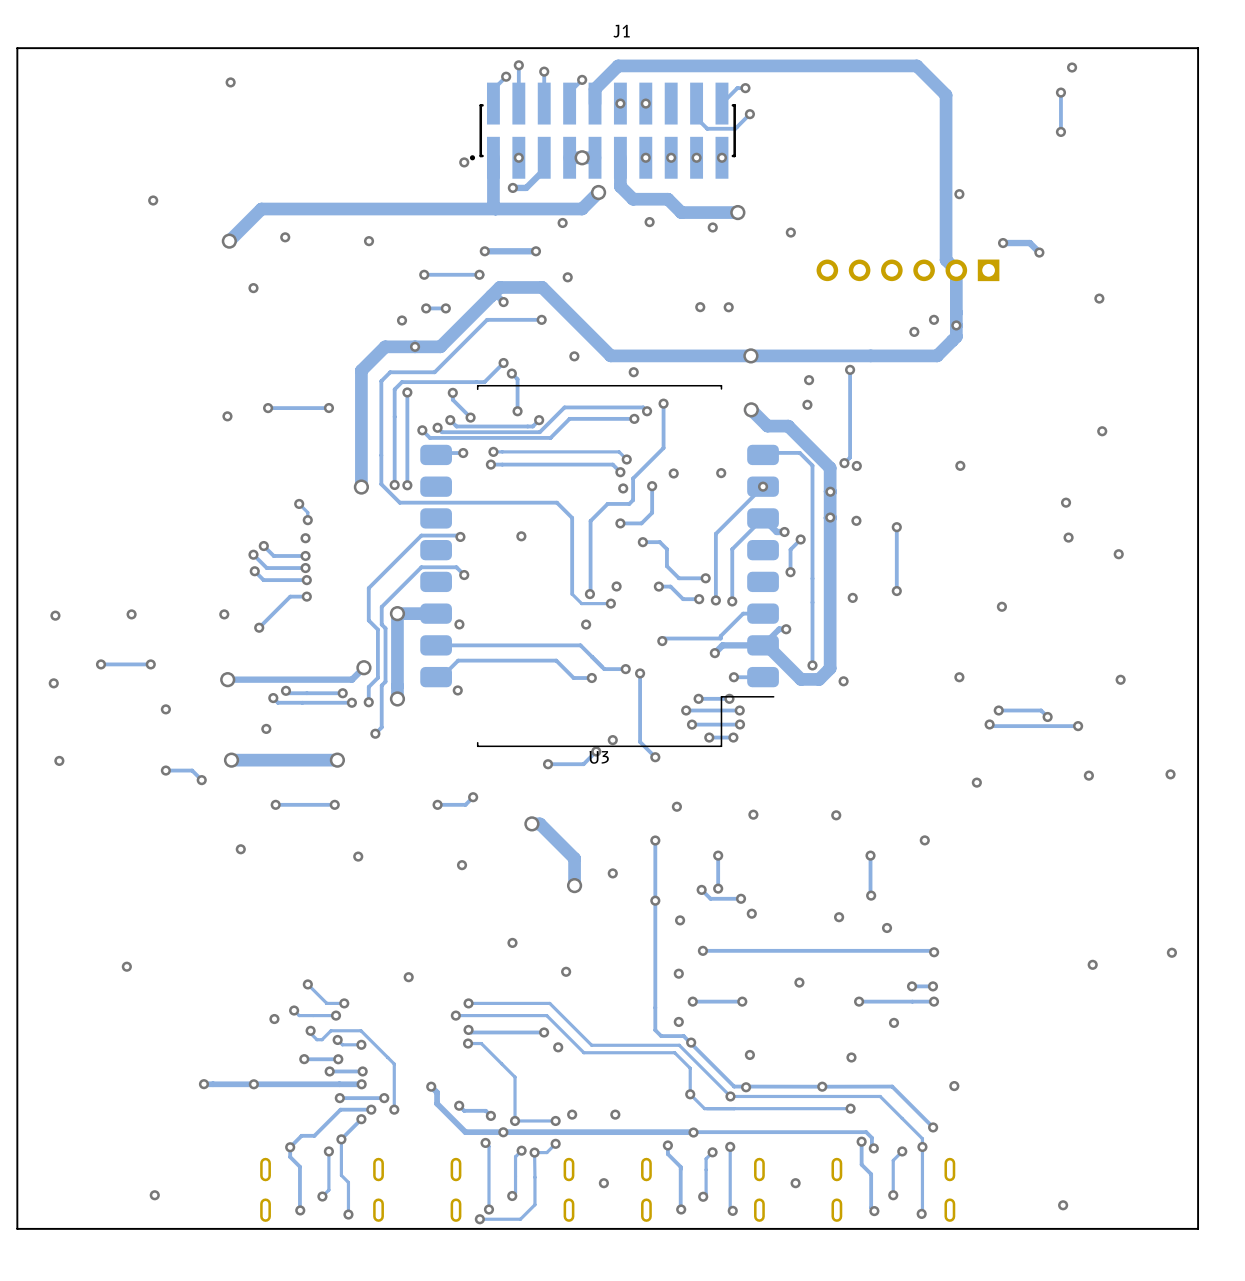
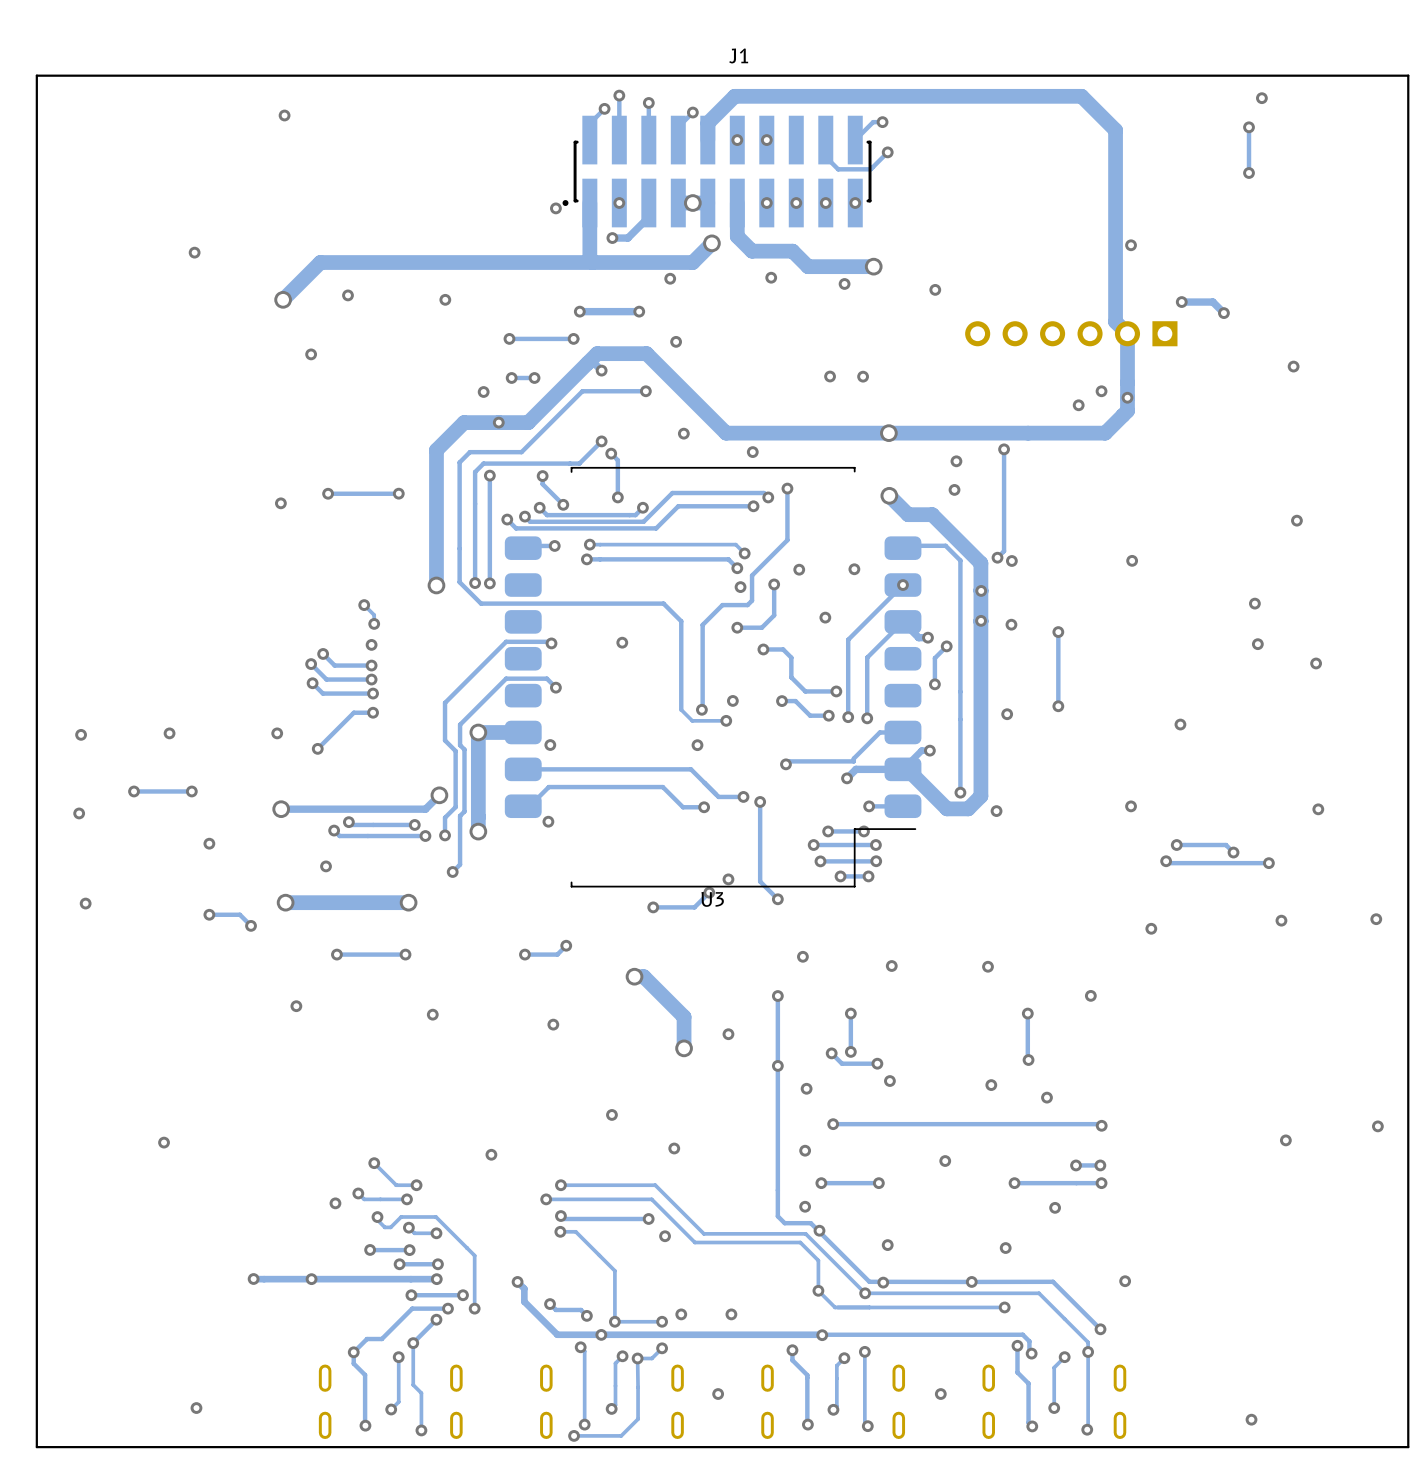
via: none -> (825, 617)

